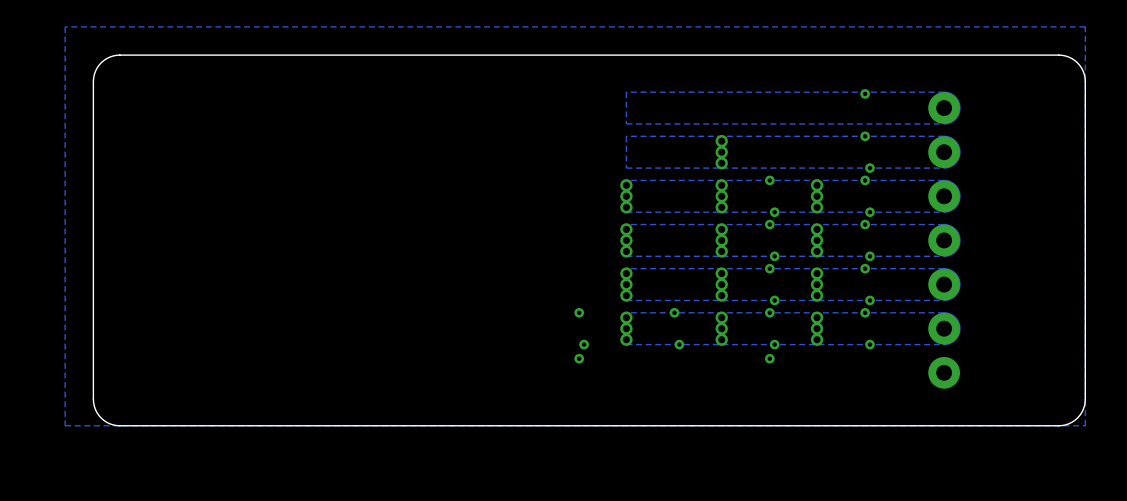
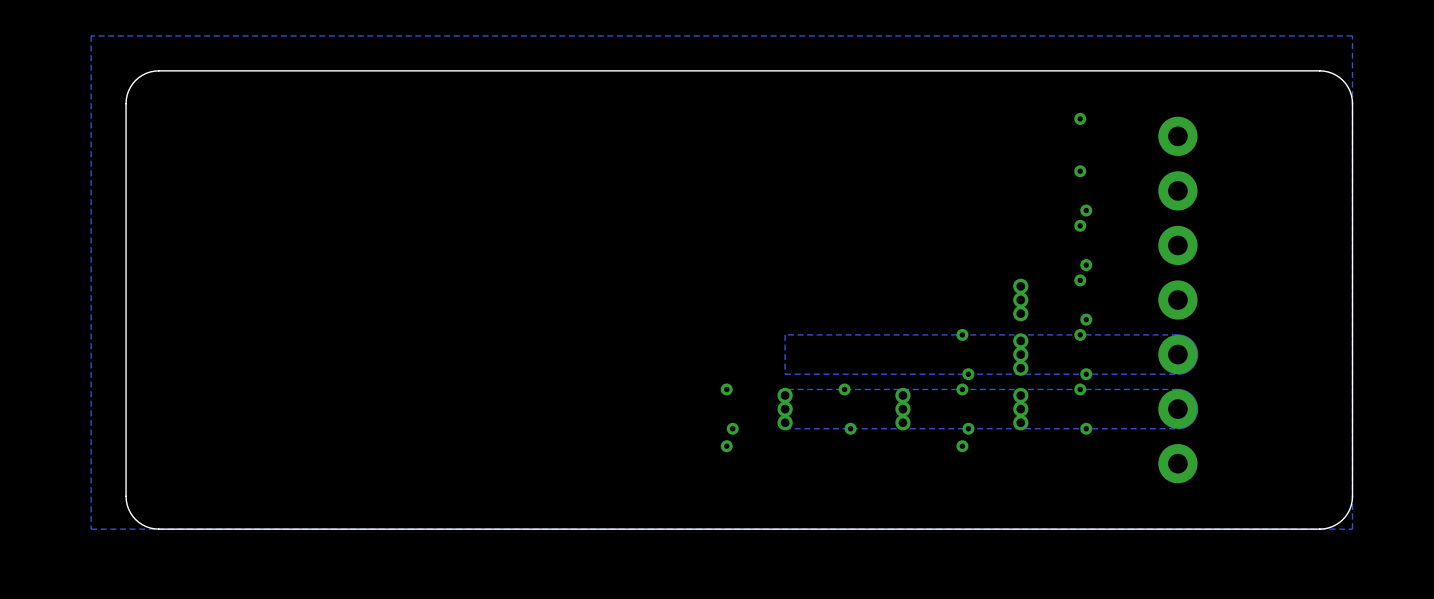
zone outline: (944, 92) (626, 92) (626, 123) (946, 123) (956, 117) (959, 105) (953, 95) (944, 92) -> none
zone outline: (944, 136) (626, 136) (626, 168) (946, 167) (956, 161) (959, 150) (953, 139) (944, 136) -> none
via: (721, 141) -> none
via: (721, 152) -> none
via: (721, 163) -> none
via: (769, 180) -> none
zone outline: (944, 180) (626, 180) (626, 212) (946, 212) (956, 205) (959, 194) (953, 183) (944, 180) -> none
via: (626, 185) -> none
via: (721, 185) -> none
via: (817, 185) -> none
via: (626, 196) -> none
via: (721, 196) -> none
via: (817, 196) -> none
via: (626, 207) -> none
via: (721, 207) -> none
via: (817, 207) -> none
via: (774, 212) -> none
via: (769, 224) -> none
zone outline: (944, 224) (626, 224) (626, 256) (946, 256) (956, 250) (959, 238) (953, 227) (944, 224) -> none
via: (626, 229) -> none
via: (721, 229) -> none
via: (626, 240) -> none
via: (721, 240) -> none
via: (626, 251) -> none
via: (721, 251) -> none
via: (774, 256) -> none
via: (626, 273) -> none
via: (721, 273) -> none
via: (626, 284) -> none
via: (721, 284) -> none
via: (626, 295) -> none
via: (721, 295) -> none

